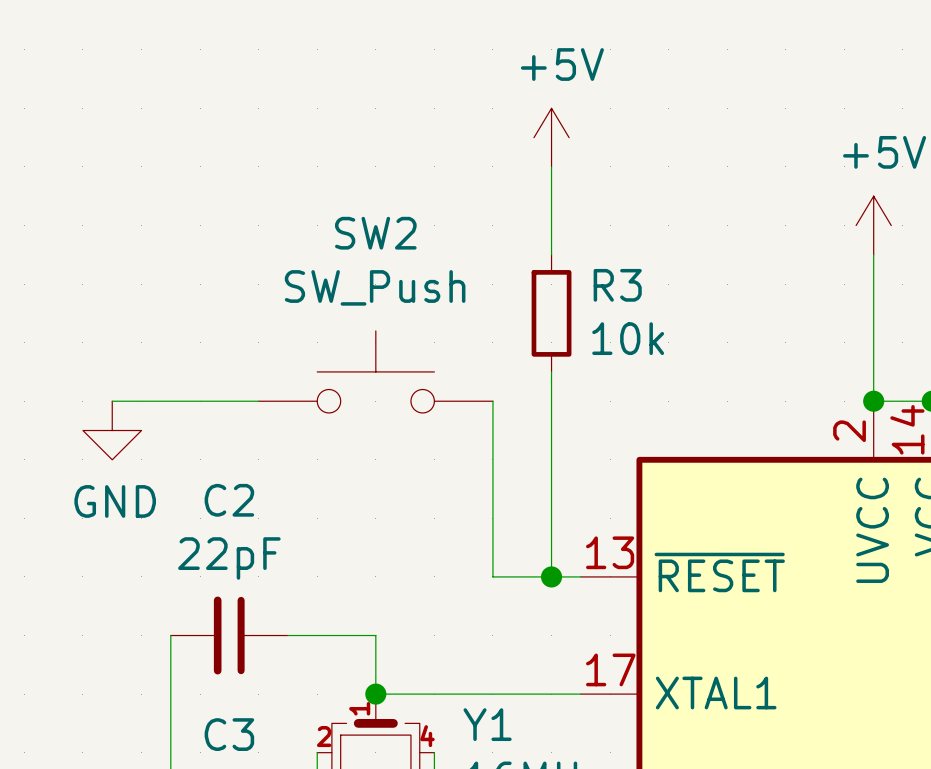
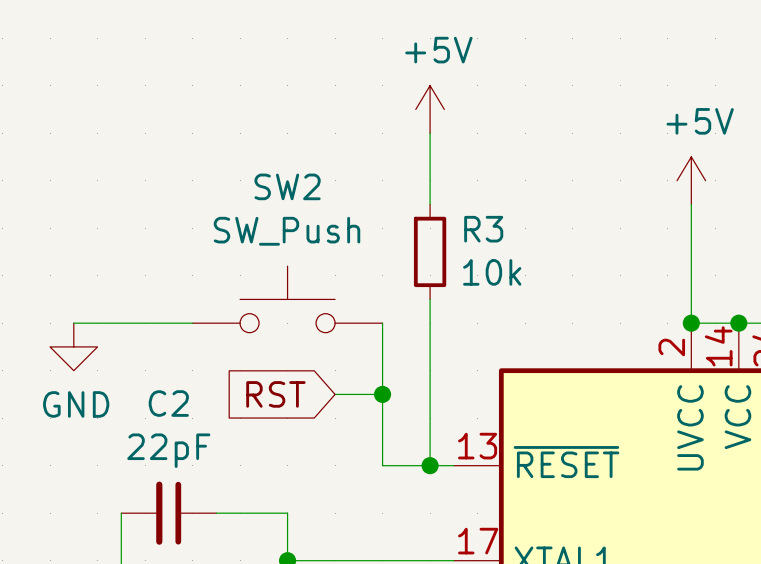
global label: none -> RST (275, 394)
wire: none -> (335, 394) (382, 394)
junction: none -> (382, 394)

